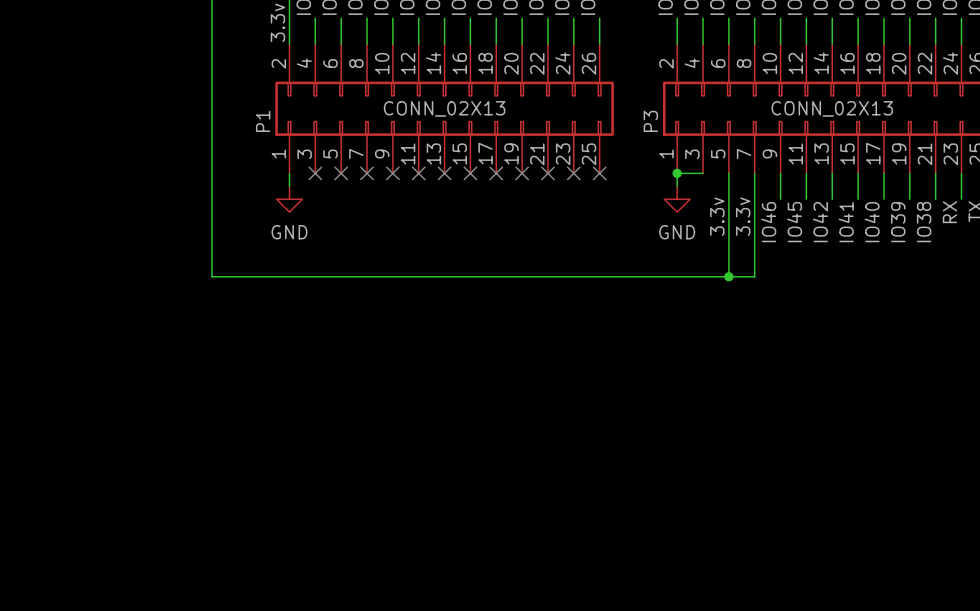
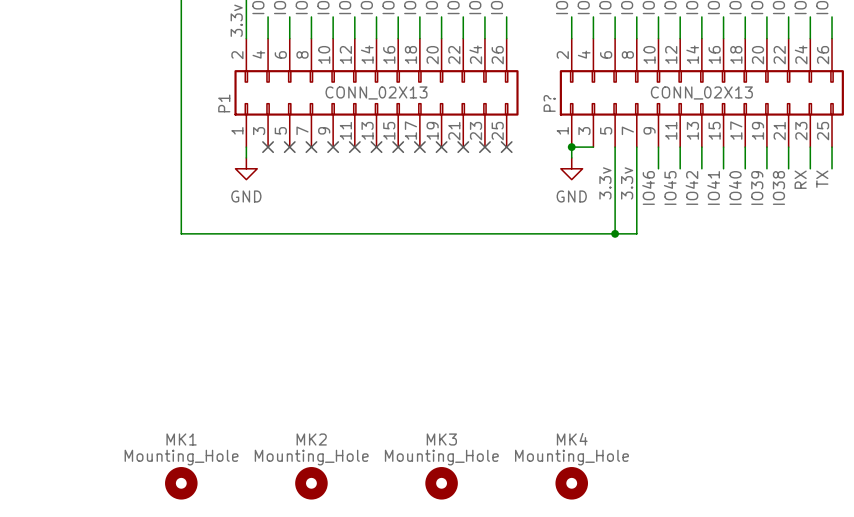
P3 name: P3 (650, 121) -> P? (549, 103)
MK1: none -> Mounting_Hole (181, 483)
MK2: none -> Mounting_Hole (311, 483)
MK3: none -> Mounting_Hole (441, 483)
MK4: none -> Mounting_Hole (571, 483)

